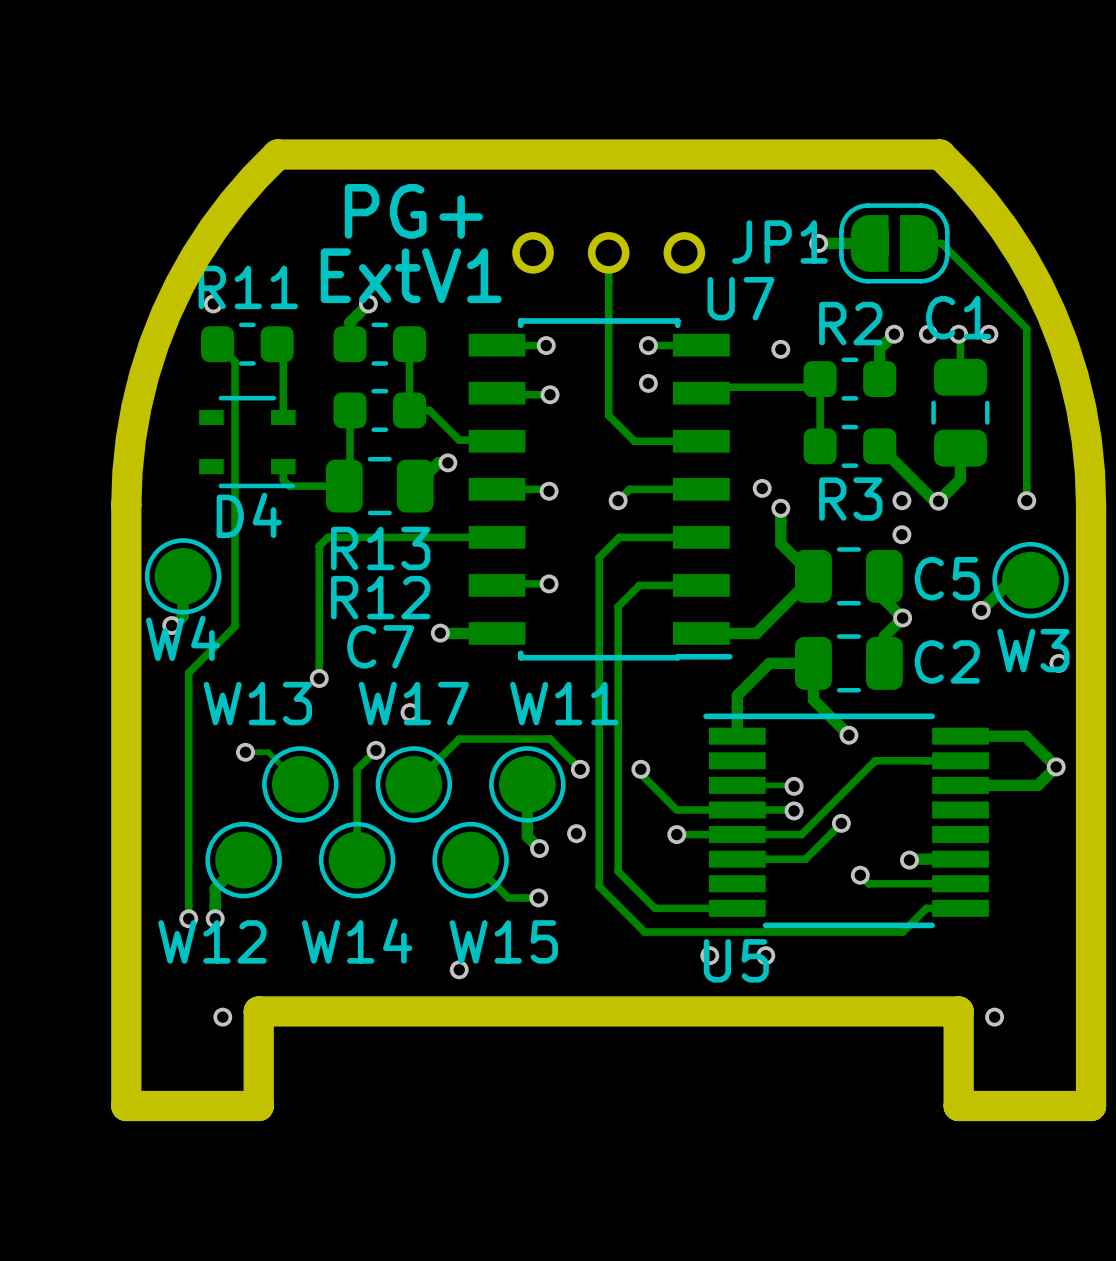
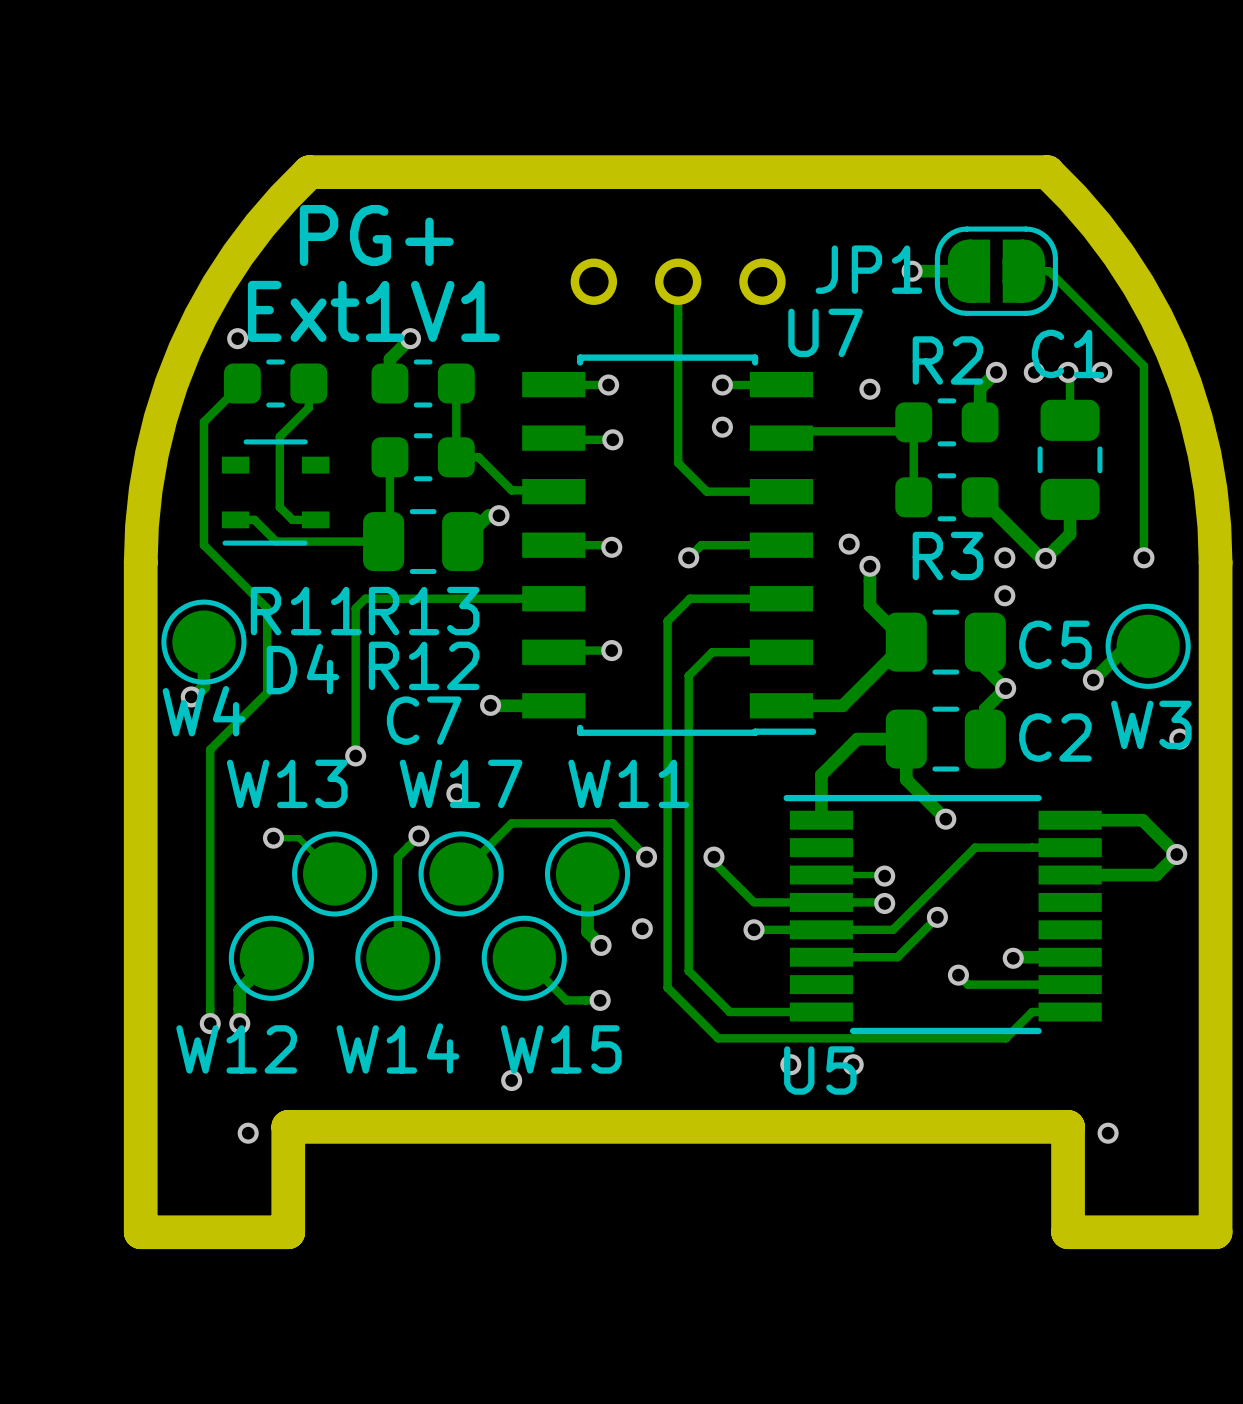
text position: PG+ (413, 211) -> PG+ (376, 235)
text: ExtV1 (411, 275) -> Ext1V1 (373, 311)
R11 name position: R11 (248, 287) -> R11 (306, 611)
track: (217, 344) (235, 361) (235, 626) -> (242, 383) (203, 421) (203, 545) (267, 608) (267, 692) (261, 698)
track: none -> (308, 383) (308, 407) (279, 436) (279, 507) (292, 519) (315, 519)
track: (283, 350) (283, 417) -> none
D4 footprint: [199, 395, 296, 489] -> [221, 439, 330, 546]
track: (283, 466) (283, 479) (289, 486) -> (235, 519) (254, 519) (276, 541) (322, 541)
D4 name position: D4 (249, 515) -> D4 (302, 669)

